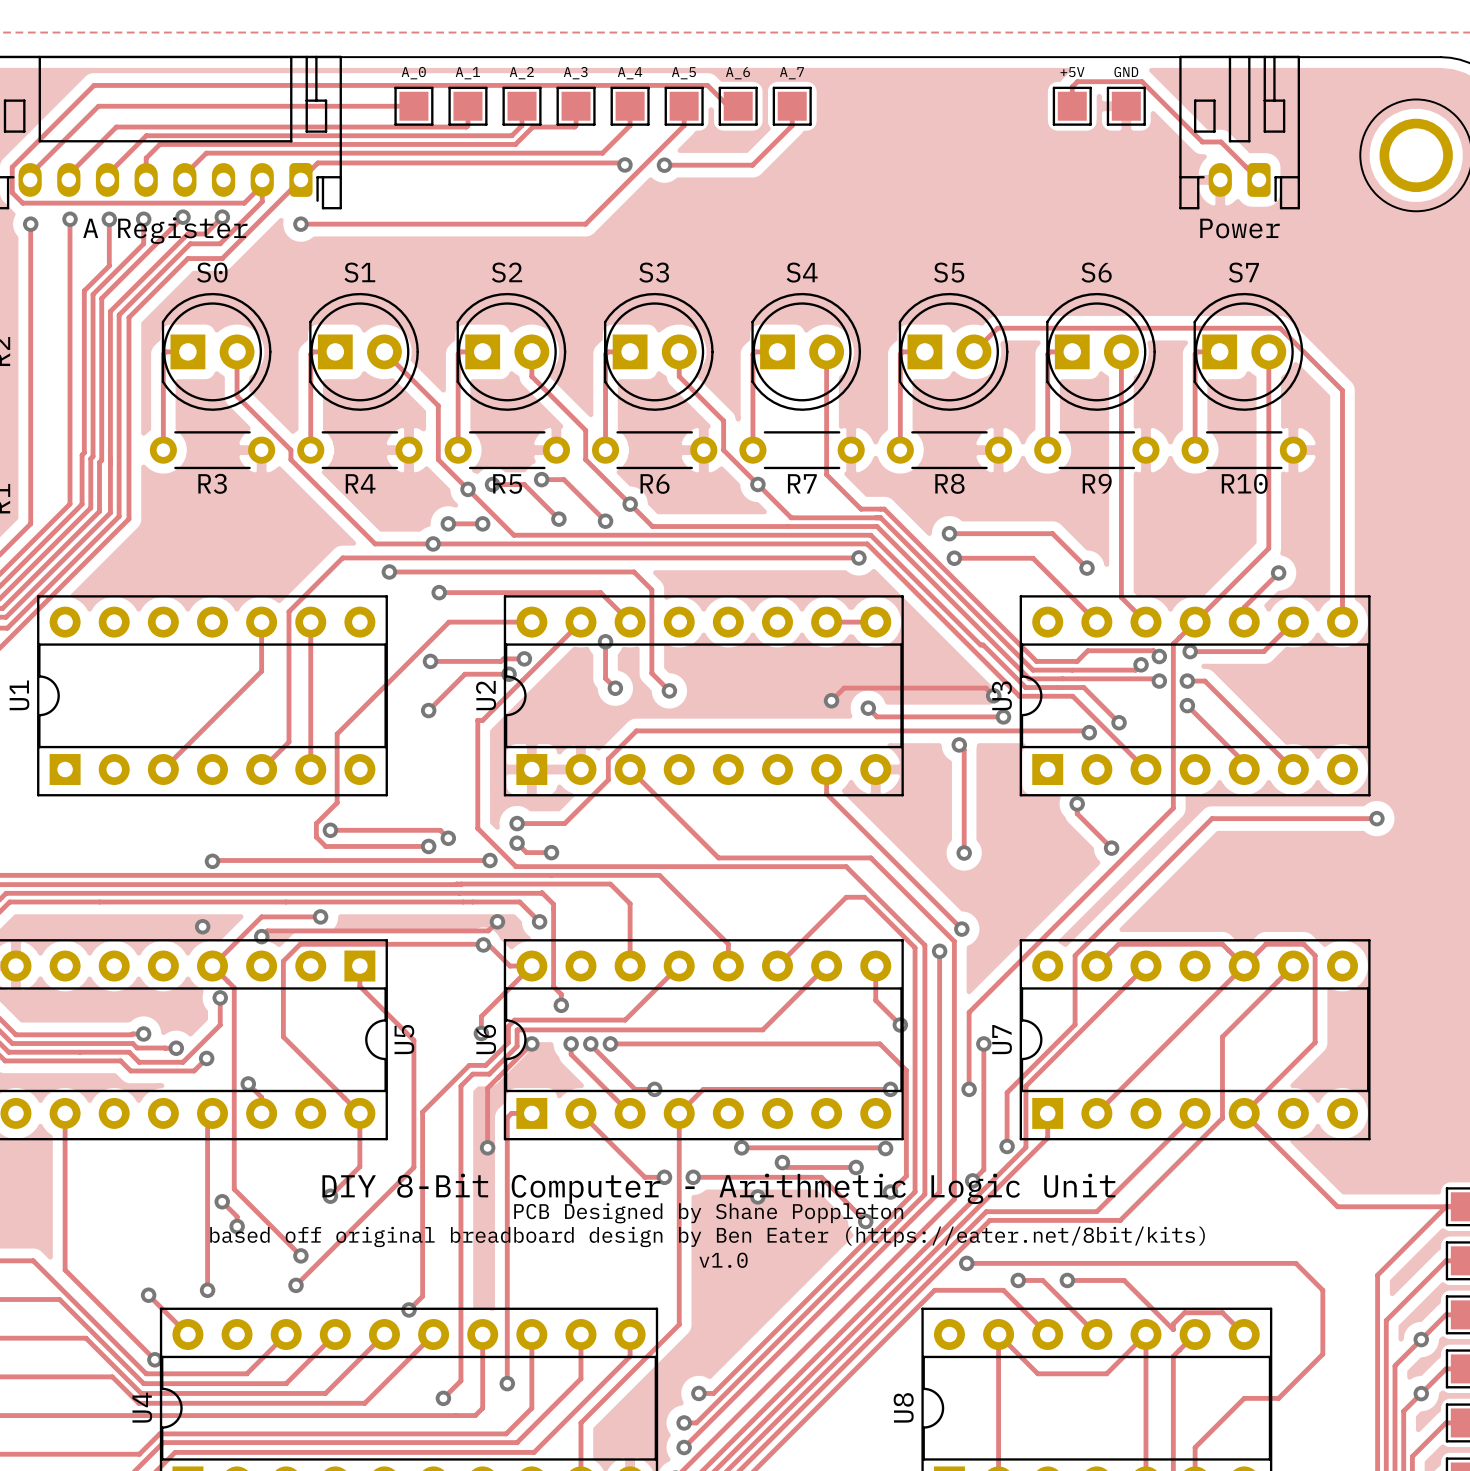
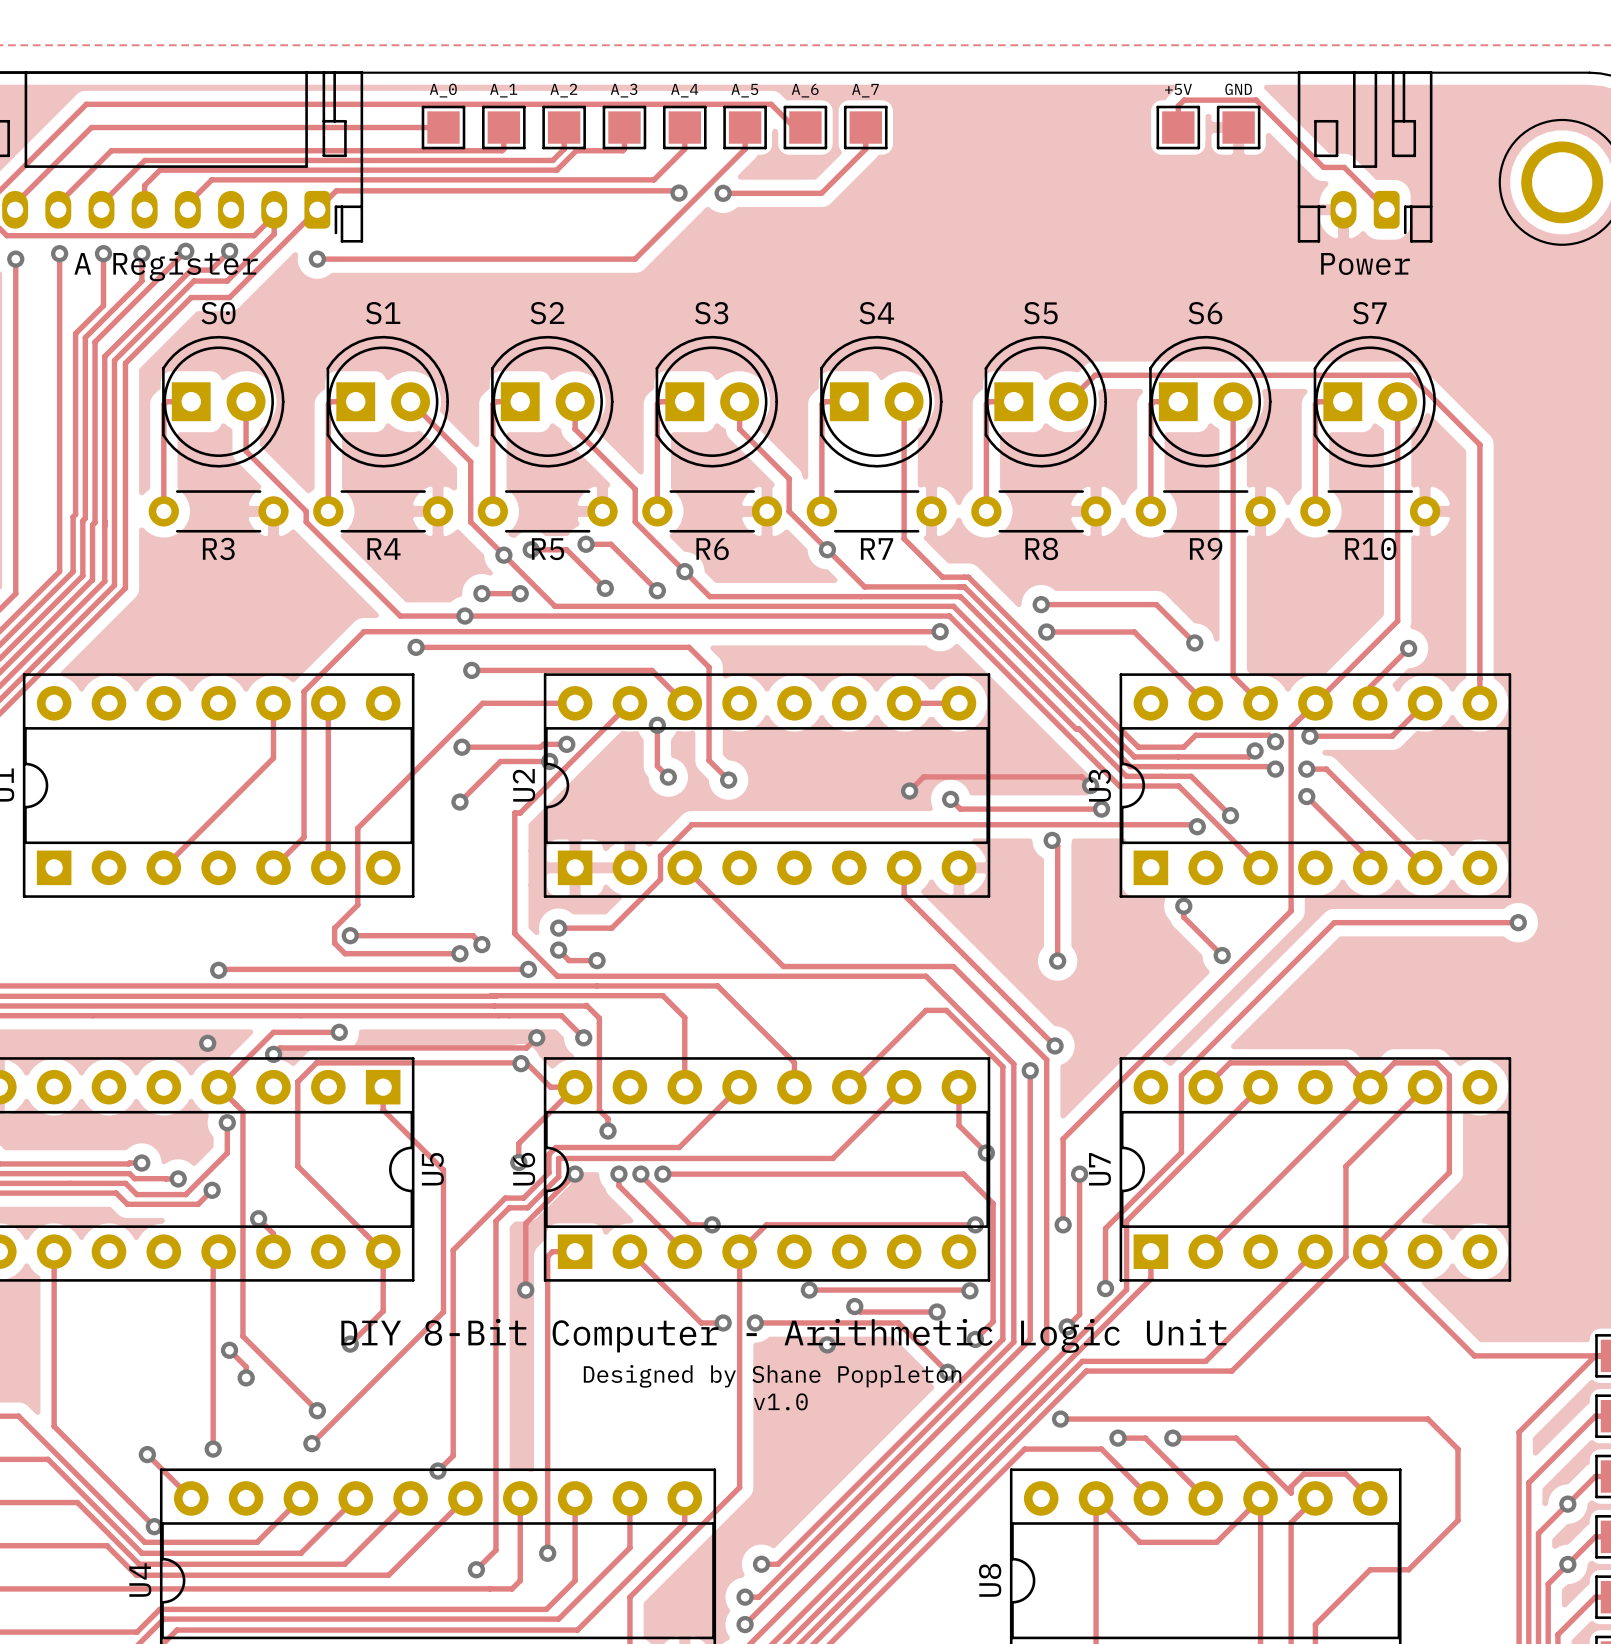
text: PCB Designed by Shane Poppleton (708, 1213) -> Designed by Shane Poppleton (772, 1376)
text: based off original breadboard design by Ben Eater (https://eater.net/8bit/kits) (707, 1236) -> none
text position: v1.0 (723, 1260) -> v1.0 (780, 1401)

